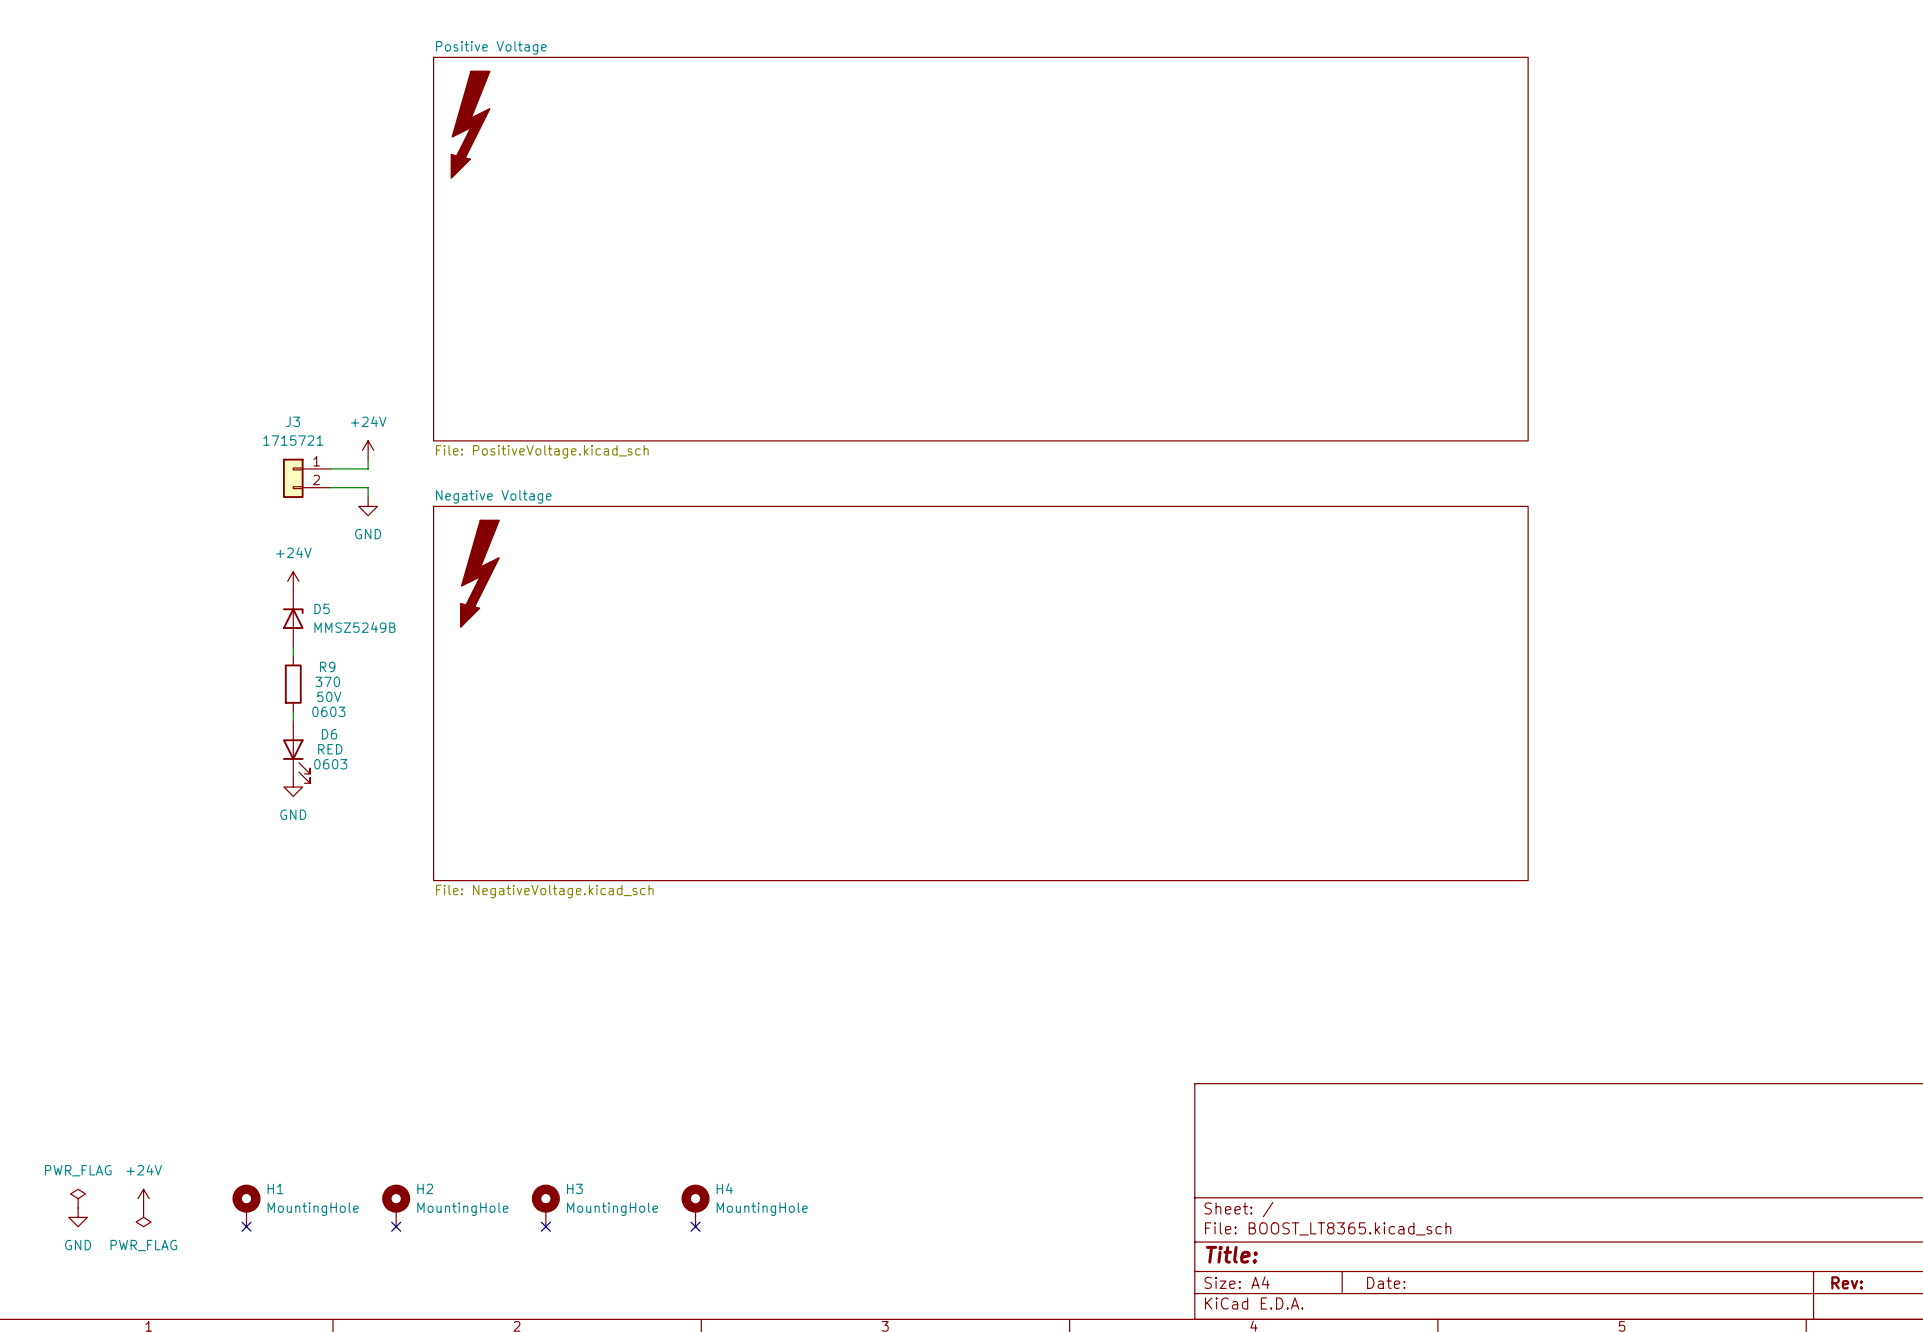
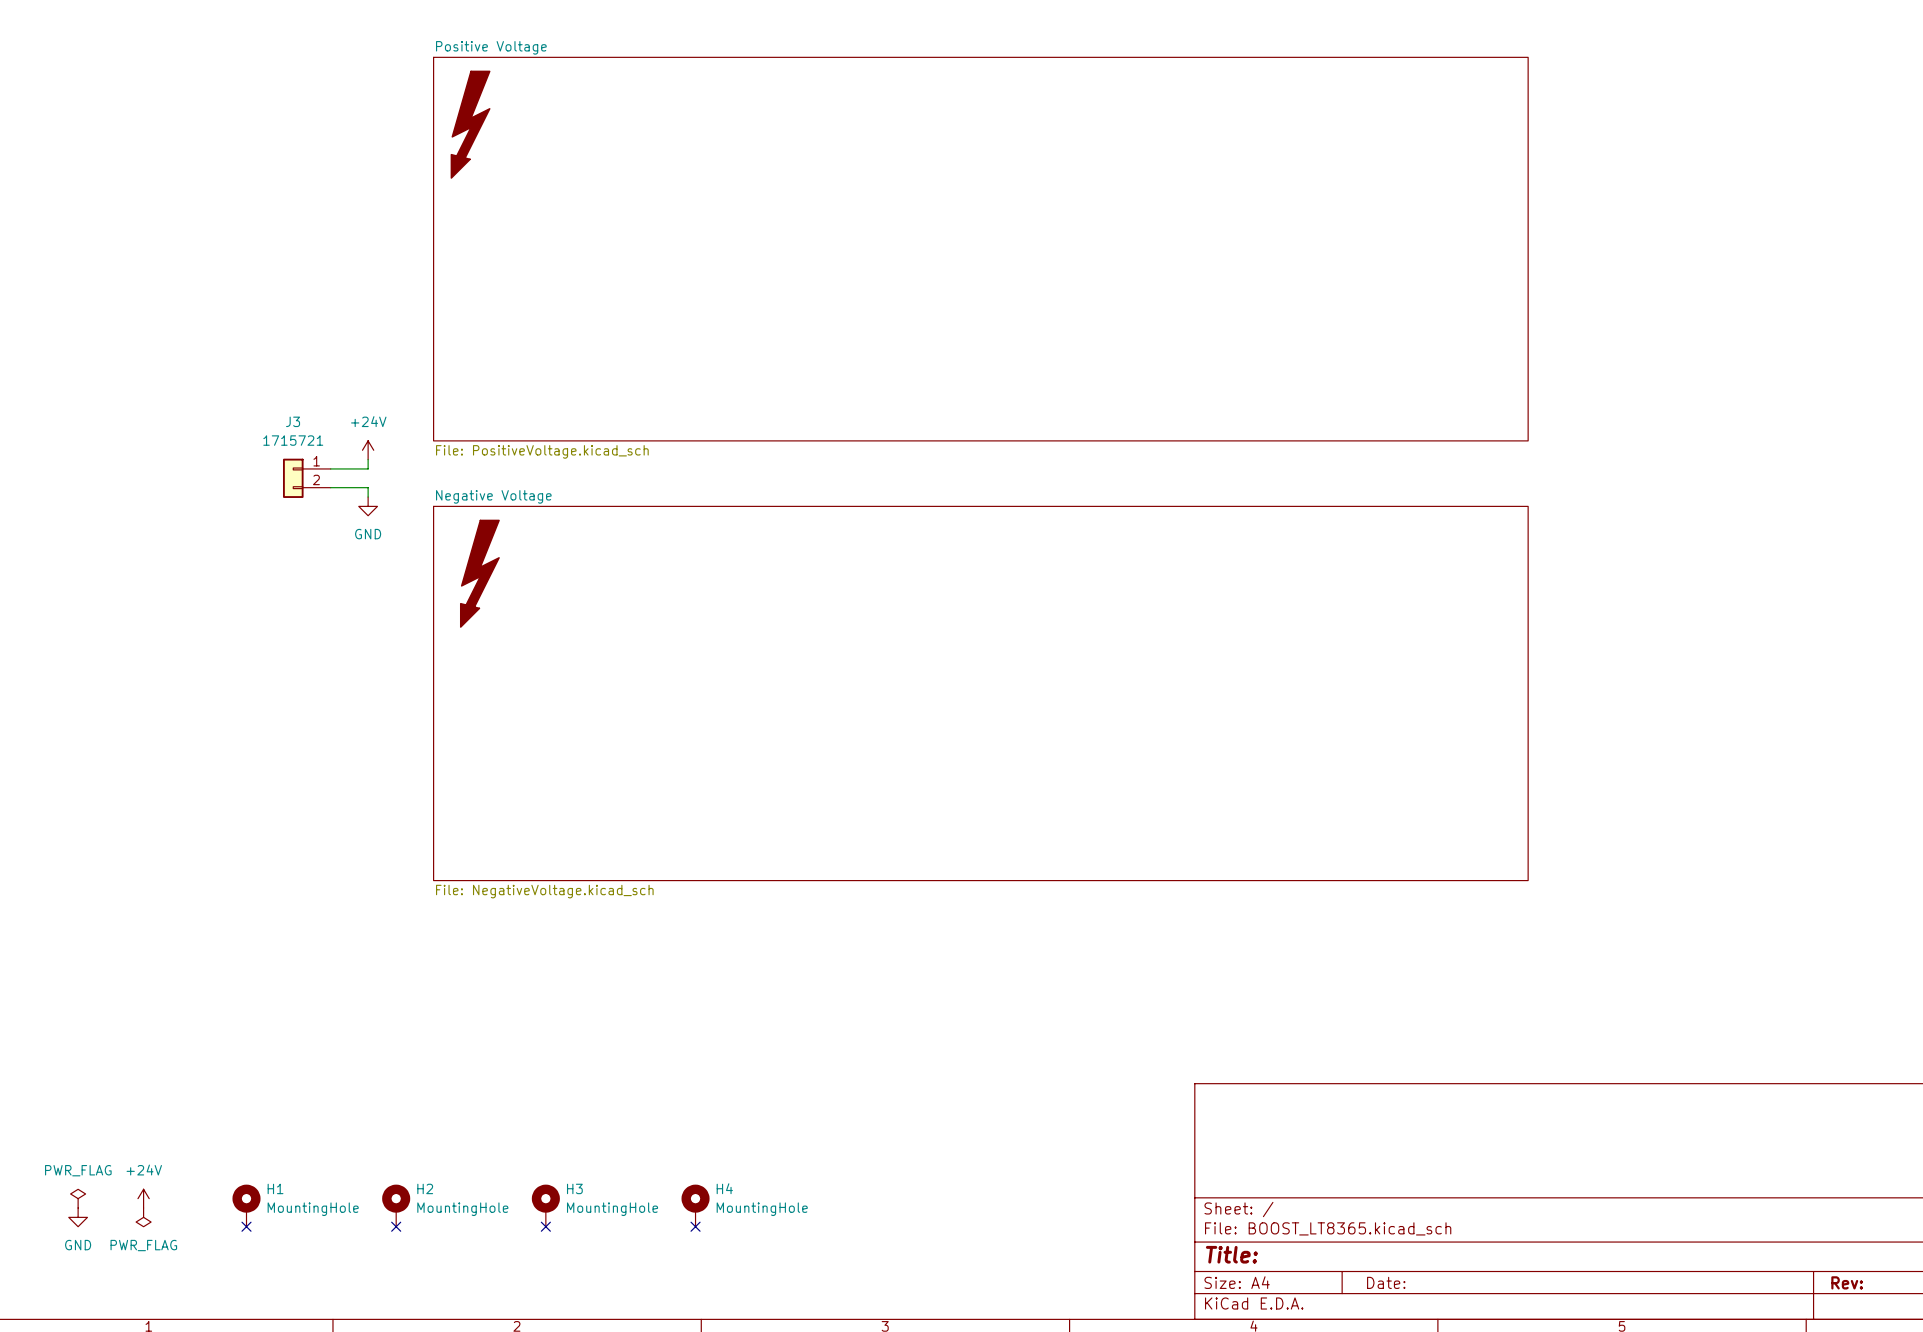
power symbol: +24V (293, 581) -> none
D5: MMSZ5249B (293, 618) -> none
wire: (293, 646) (293, 656) -> none
R9: 370 (293, 684) -> none
wire: (293, 712) (293, 721) -> none
D6: RED (296, 752) -> none
power symbol: GND (293, 787) -> none

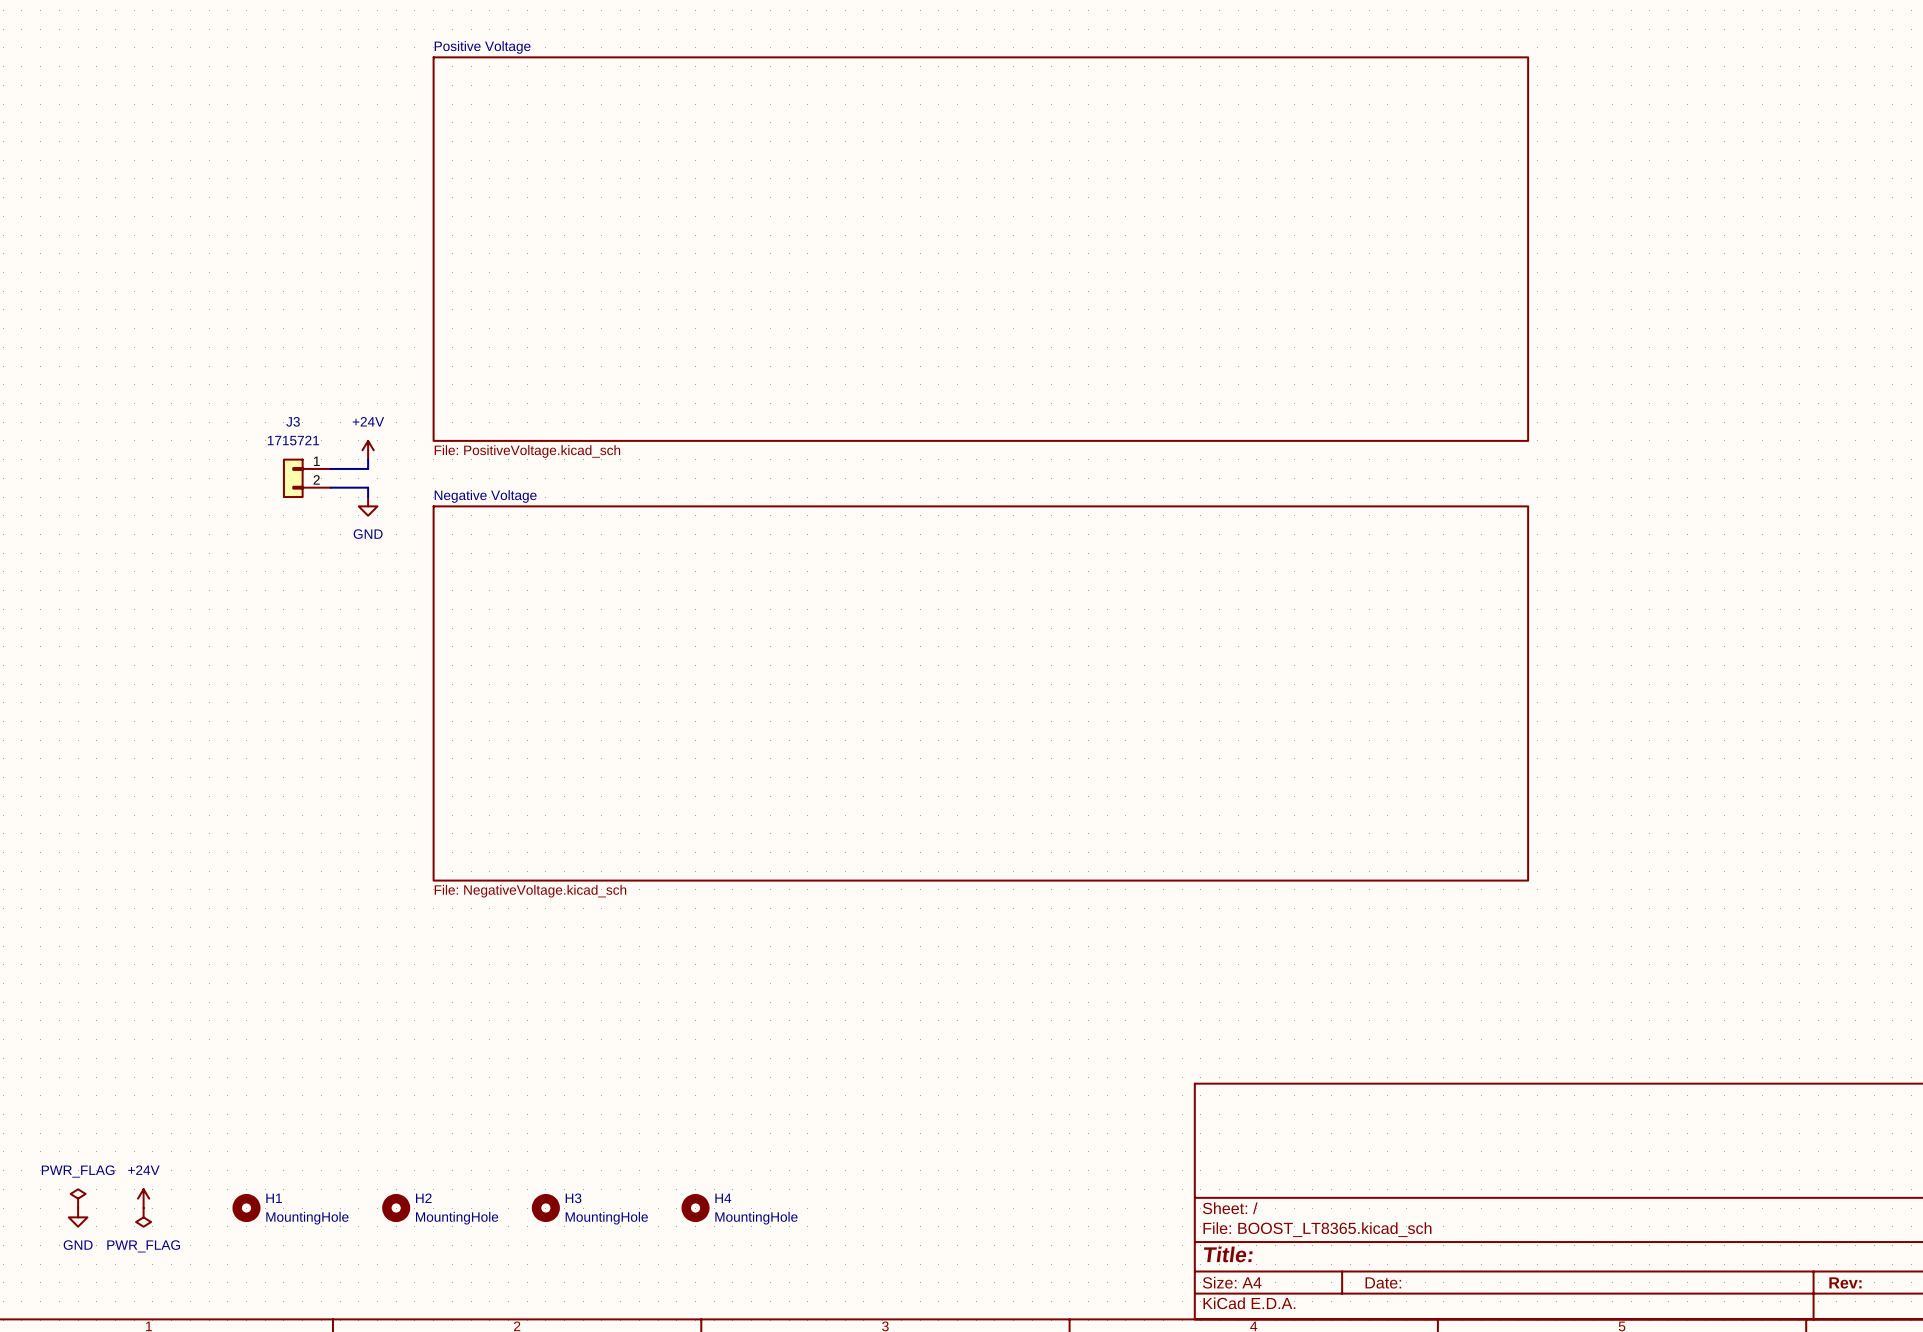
part: (470, 124) -> none
part: (479, 573) -> none
H1 symbol: [232, 1184, 261, 1227] -> [232, 1193, 261, 1223]
H2 symbol: [382, 1184, 411, 1227] -> [382, 1193, 411, 1223]
H3 symbol: [531, 1184, 560, 1227] -> [531, 1193, 560, 1223]
H4 symbol: [681, 1184, 710, 1227] -> [681, 1193, 710, 1223]
no-connect mark: (246, 1226) -> none
no-connect mark: (396, 1226) -> none
no-connect mark: (545, 1226) -> none
no-connect mark: (695, 1226) -> none

